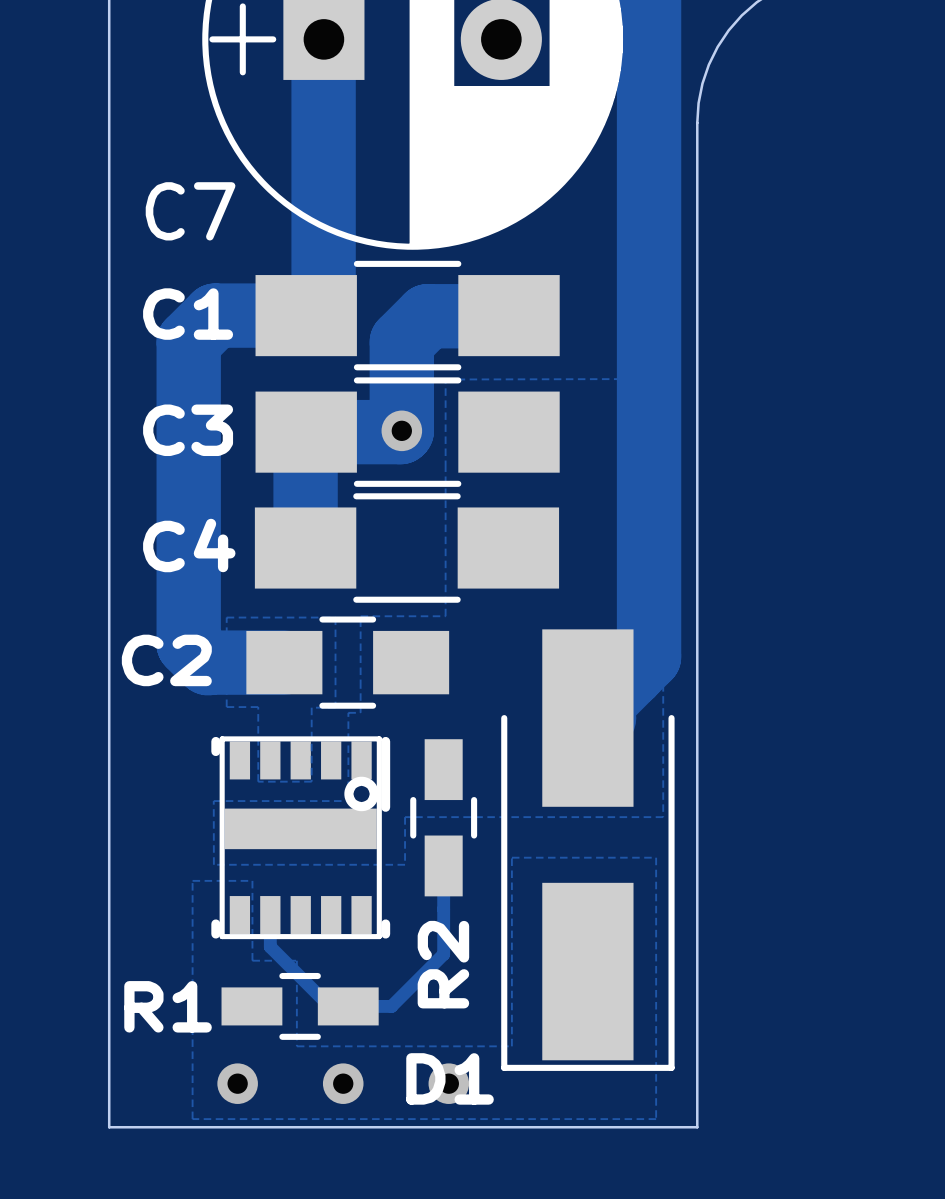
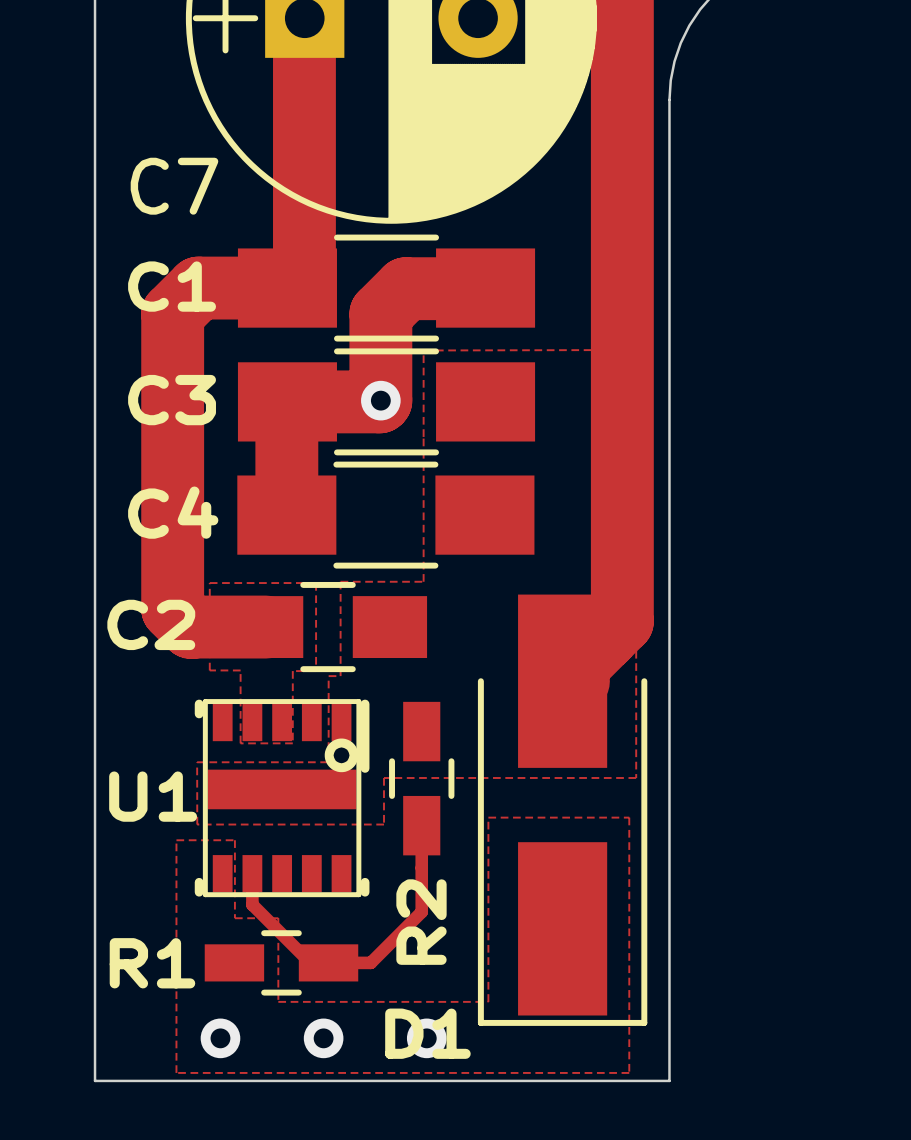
U1 name: none -> U1 (153, 796)

